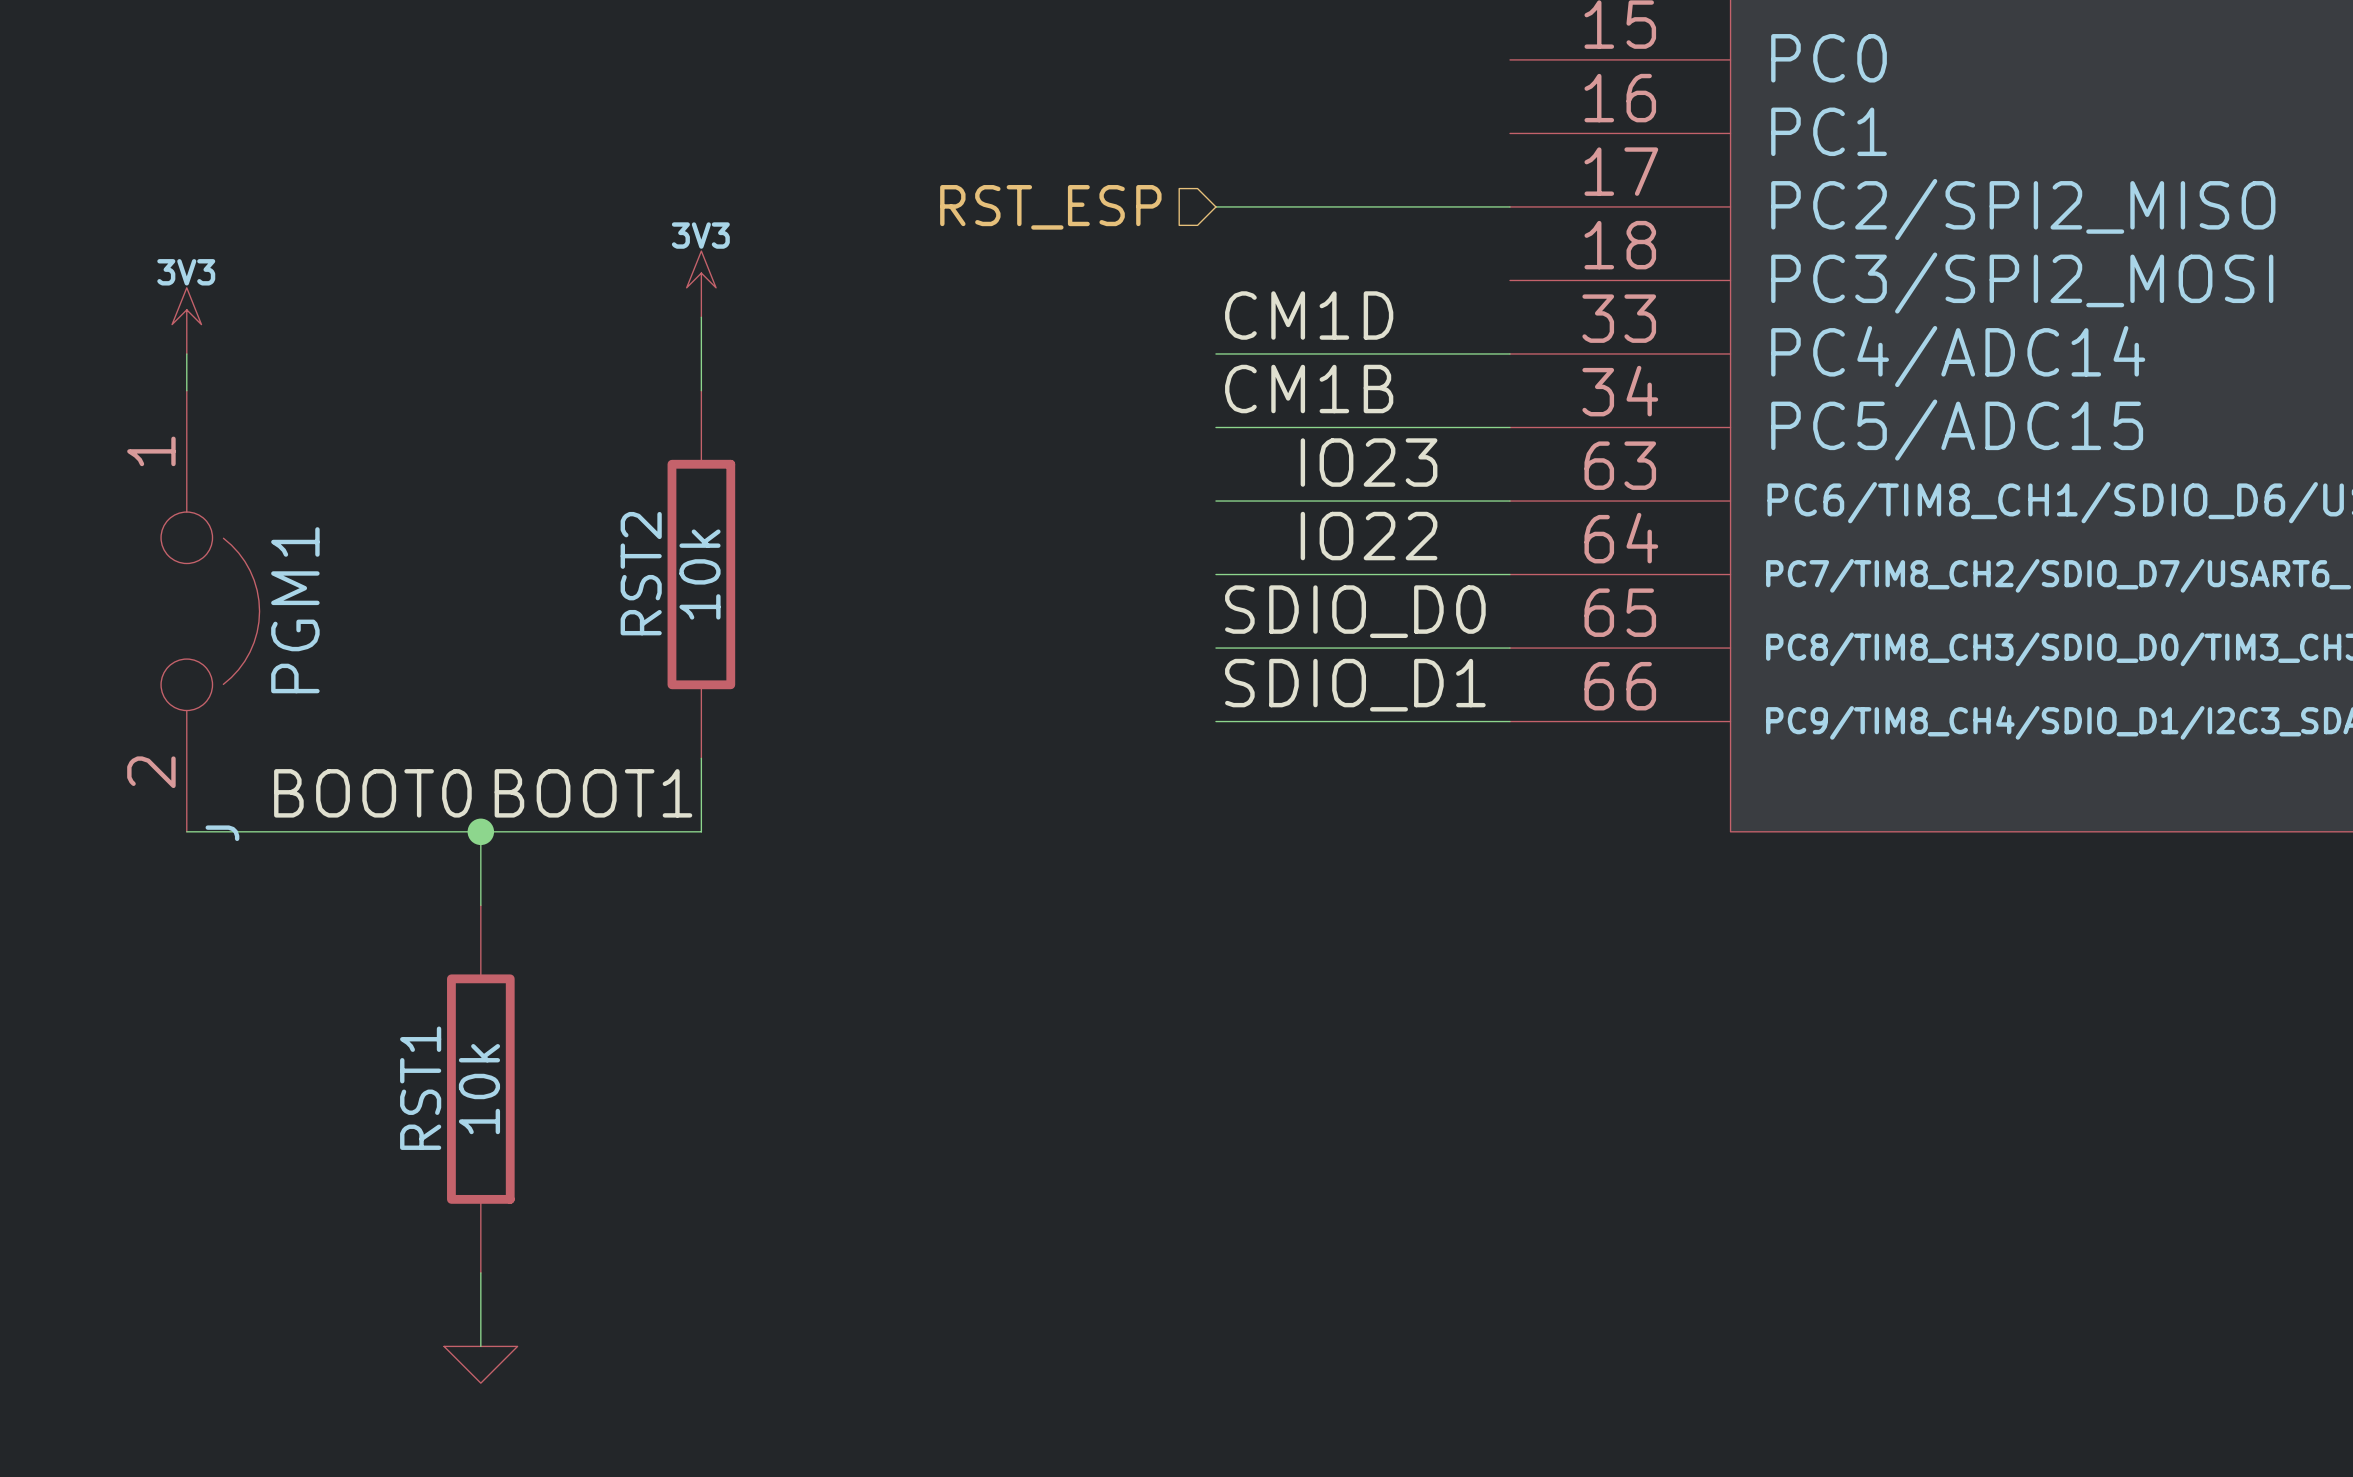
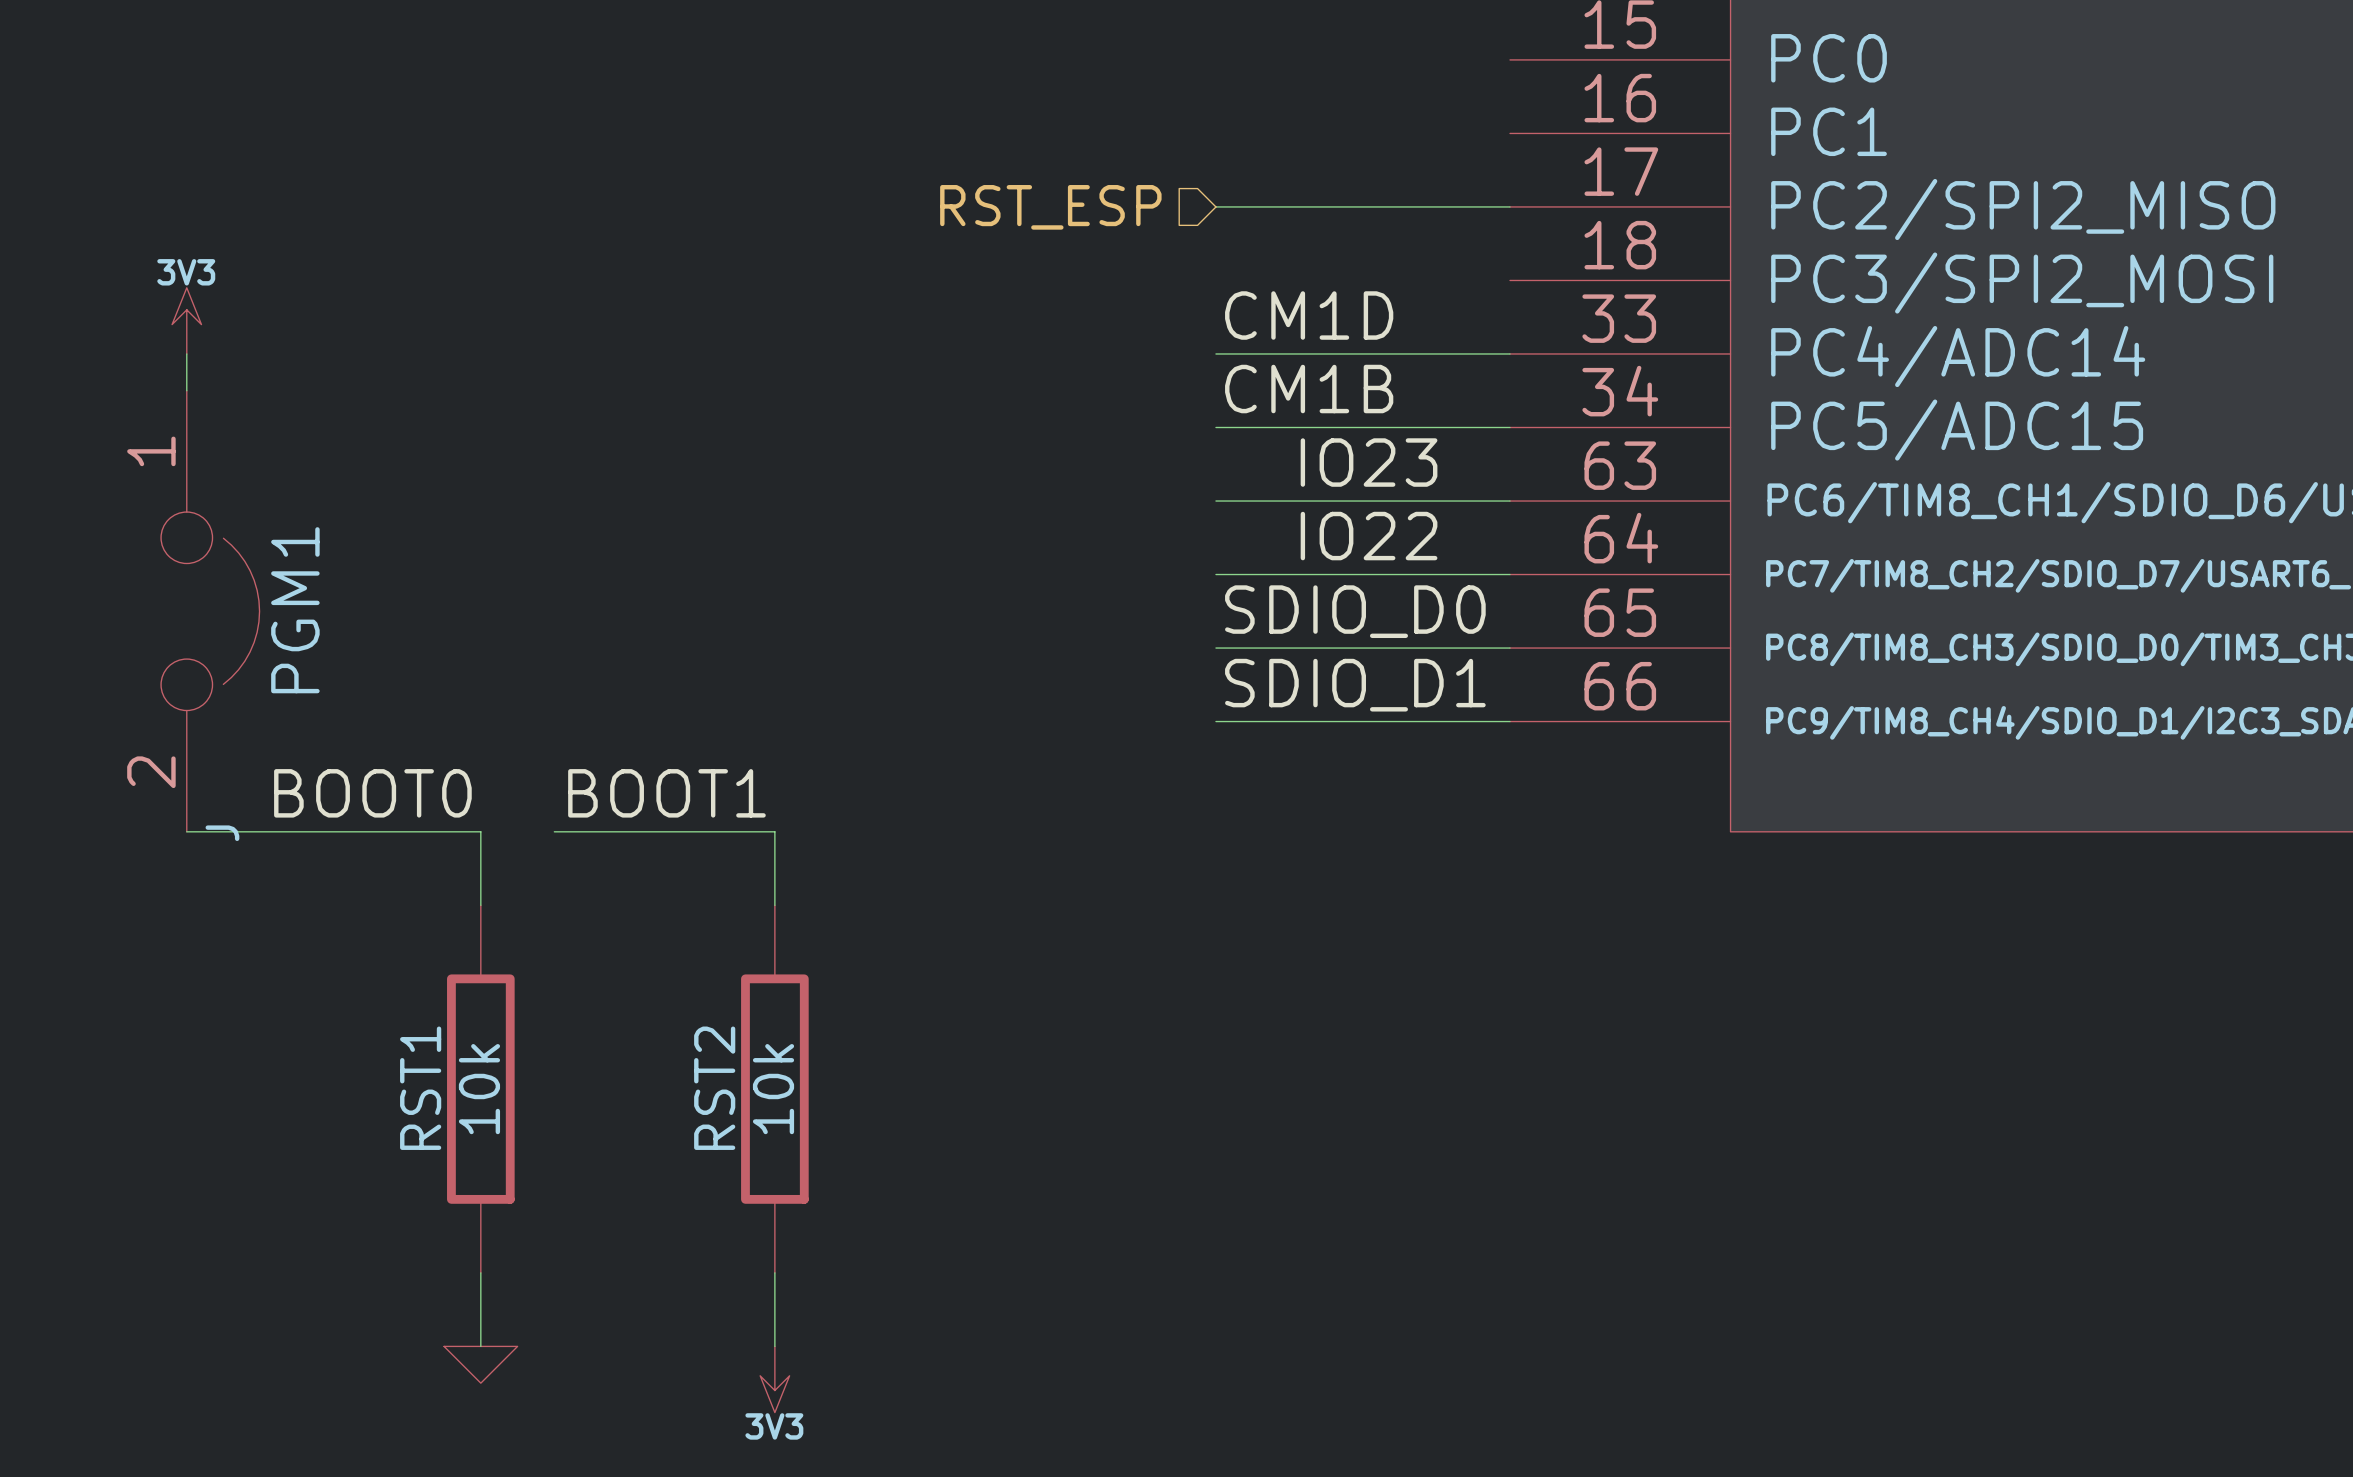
power symbol: 3V3 (701, 284) -> none
wire: (701, 317) (701, 390) -> none
RST2 position: (701, 574) -> (774, 1089)
wire: (701, 758) (701, 831) -> (774, 905) (774, 831) (701, 831)
label position: BOOT1 (593, 793) -> BOOT1 (666, 793)
wire: (480, 831) (554, 831) -> none
junction: (480, 831) -> none
wire: none -> (774, 1272) (774, 1346)
power symbol: none -> 3V3 (774, 1379)

